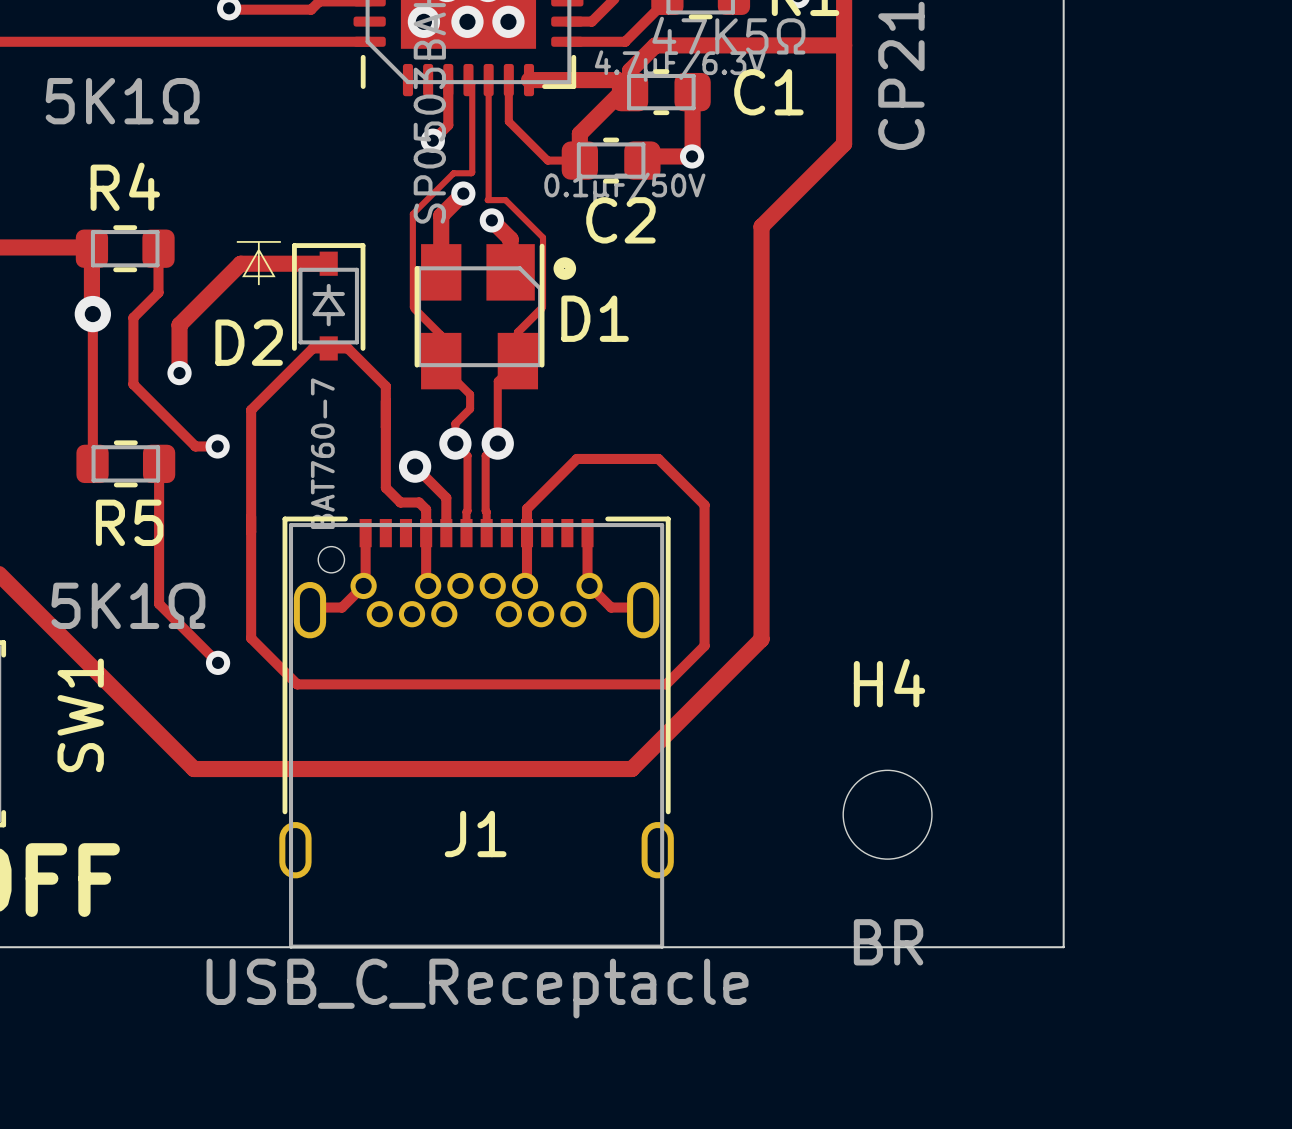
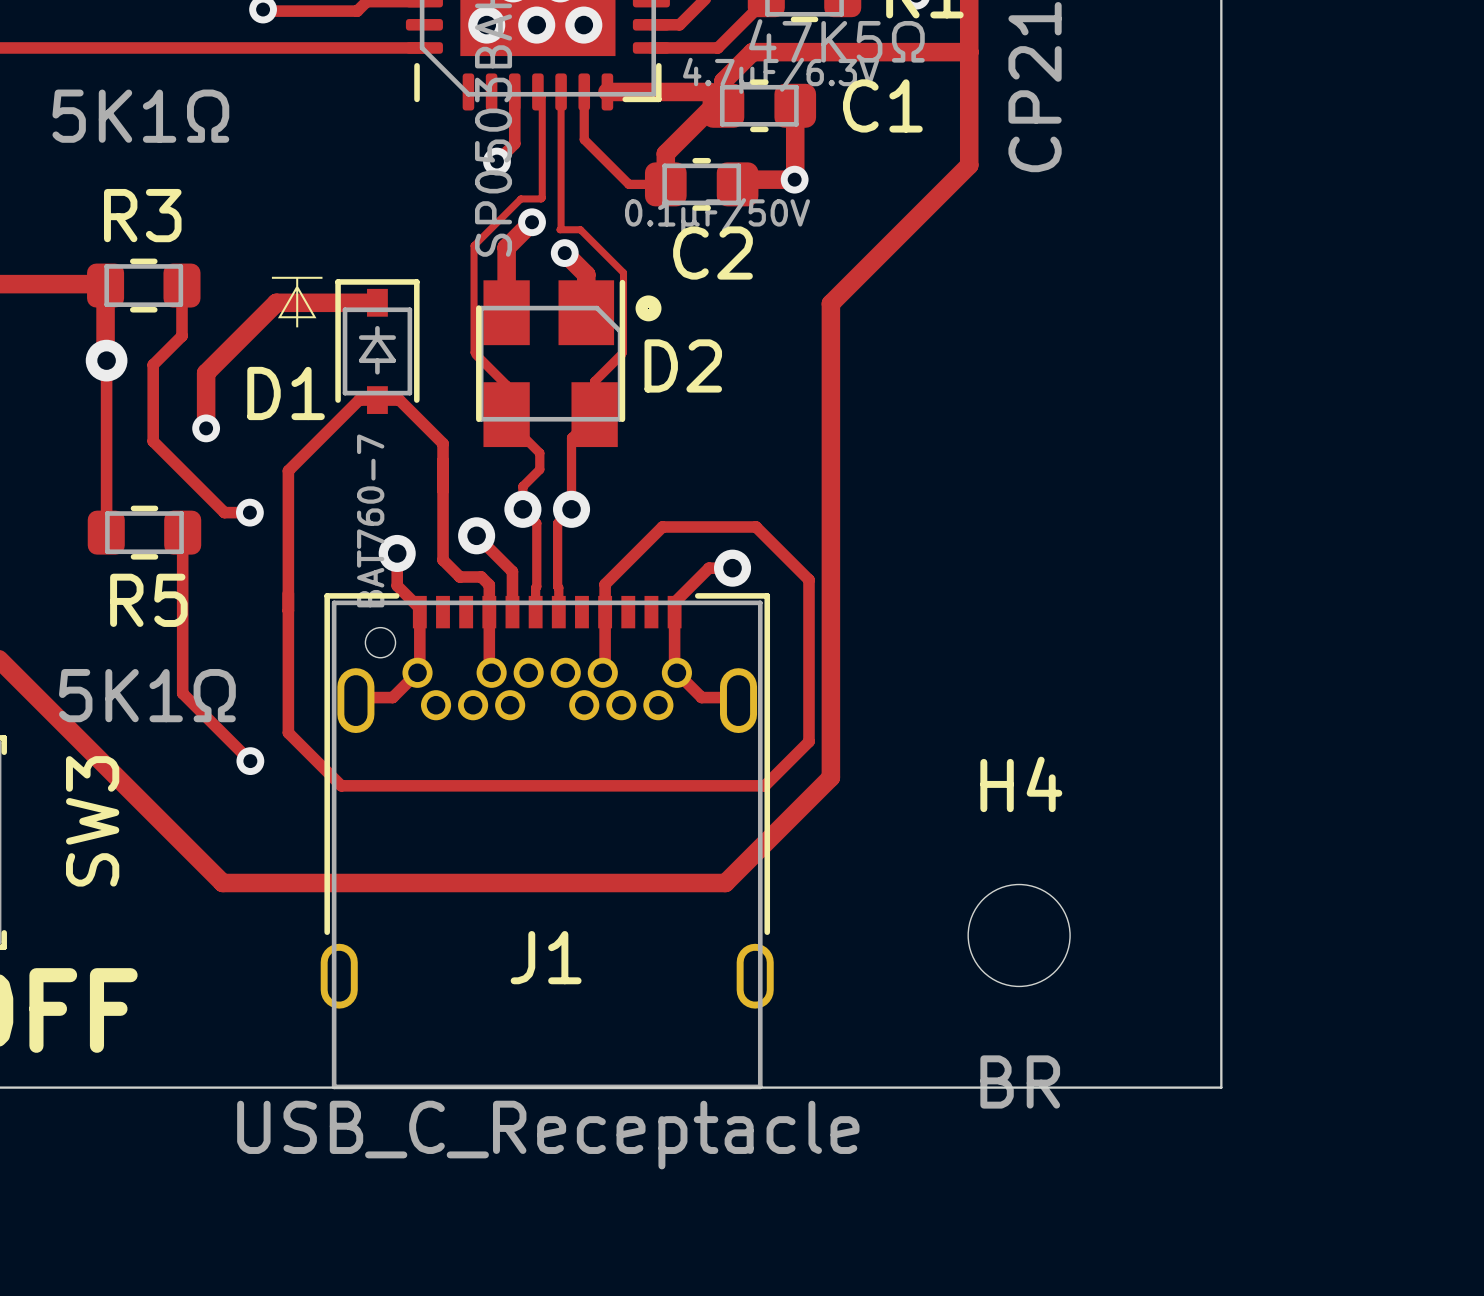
R4 name: R4 (125, 186) -> R3 (142, 215)
track: (761, 226) (761, 639) (723, 677) -> (874, 260) (830, 303) (830, 777)
D1 name: D1 (595, 318) -> D2 (683, 365)
D2 name: D2 (249, 342) -> D1 (286, 393)
track: none -> (397, 553) (397, 585) (419, 608)
via: none -> (397, 553)
track: none -> (732, 568) (708, 568) (674, 602)
via: none -> (732, 568)
SW1 name: SW1 (80, 715) -> SW3 (92, 821)

